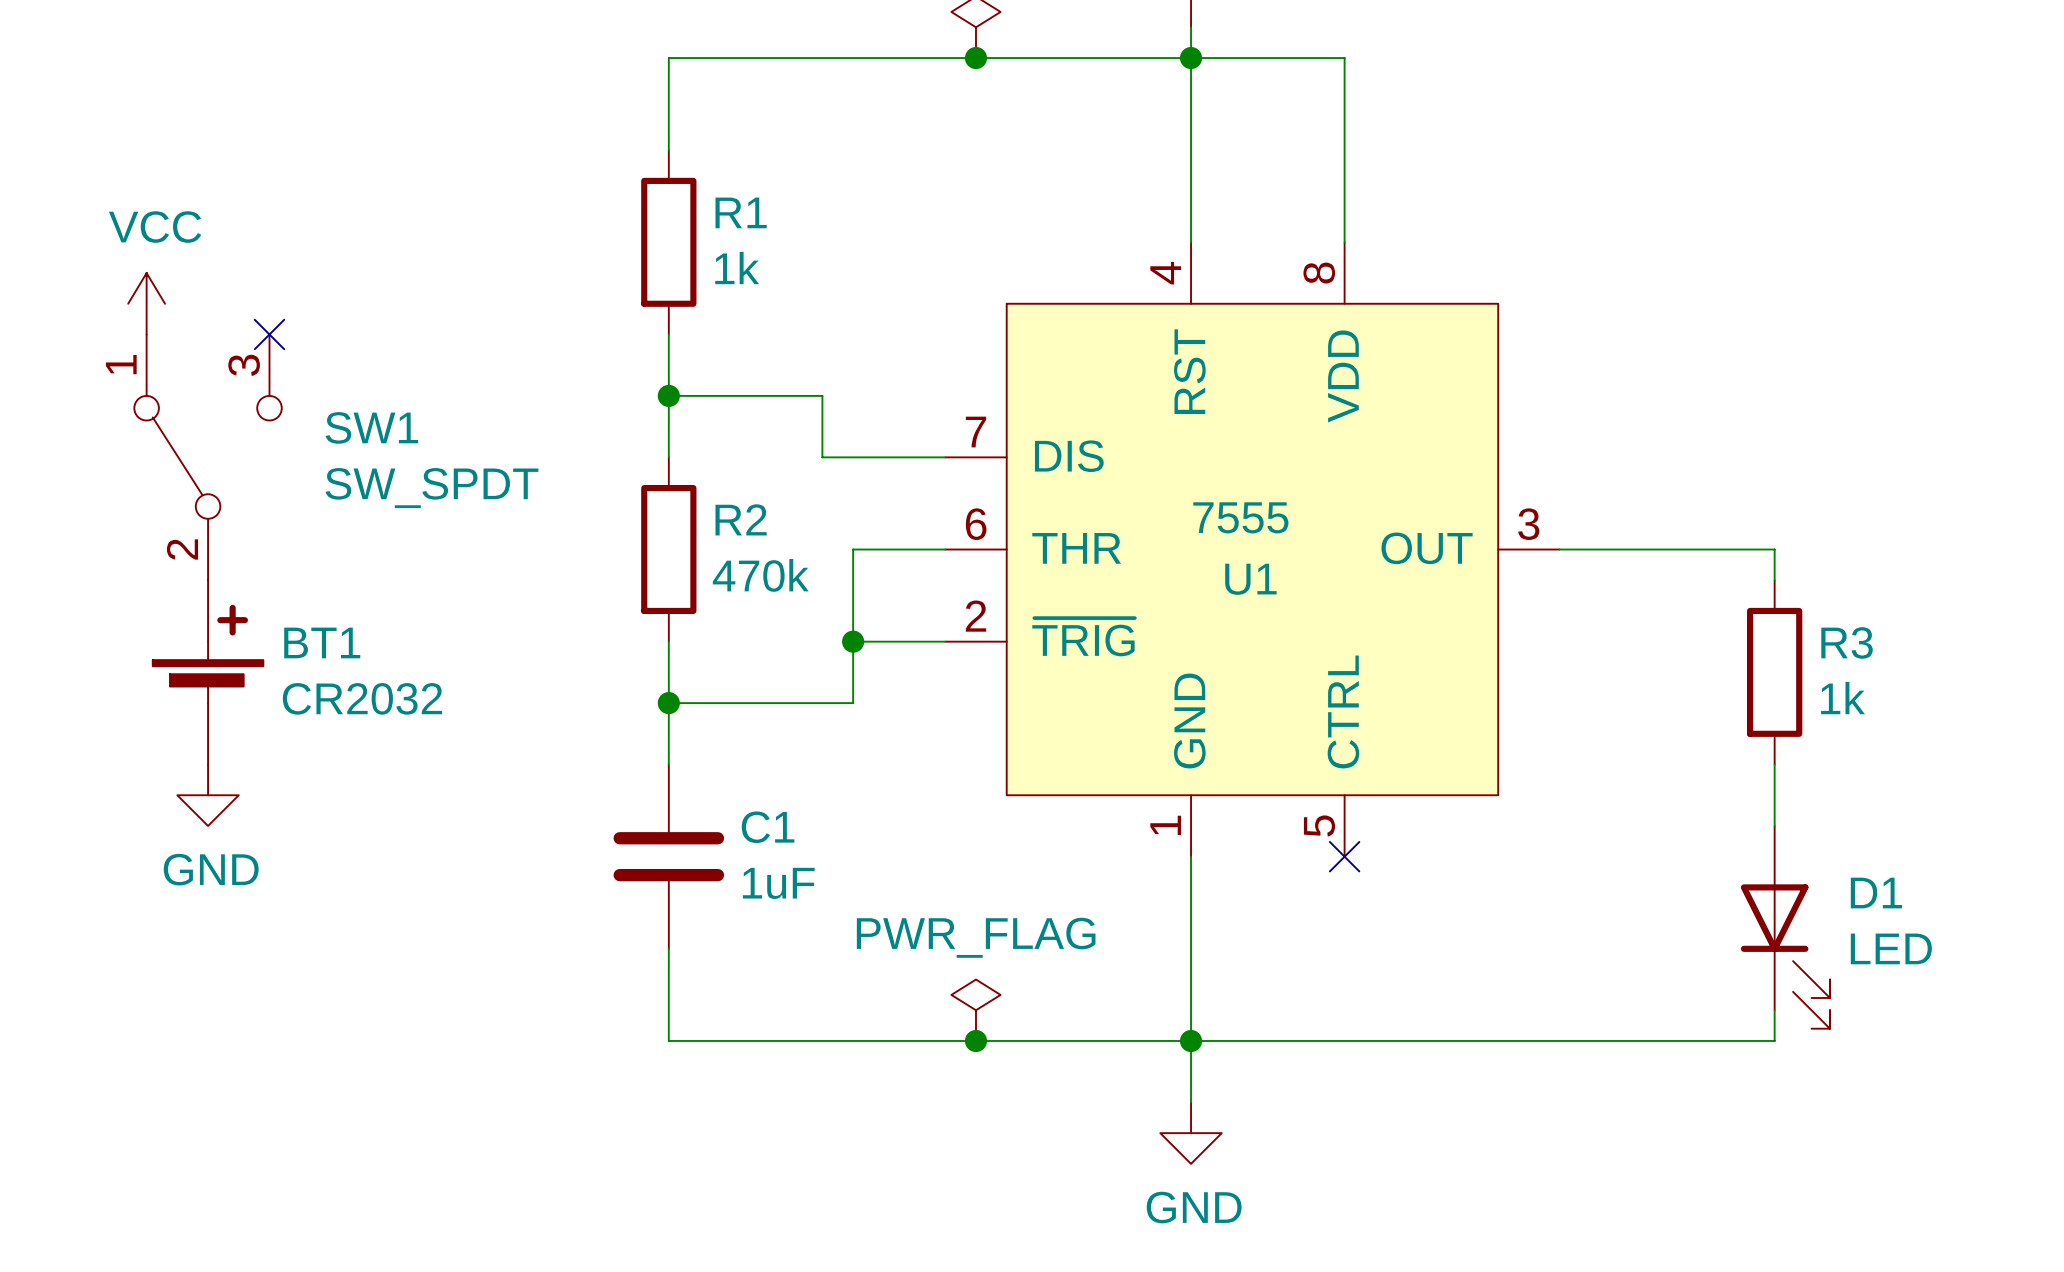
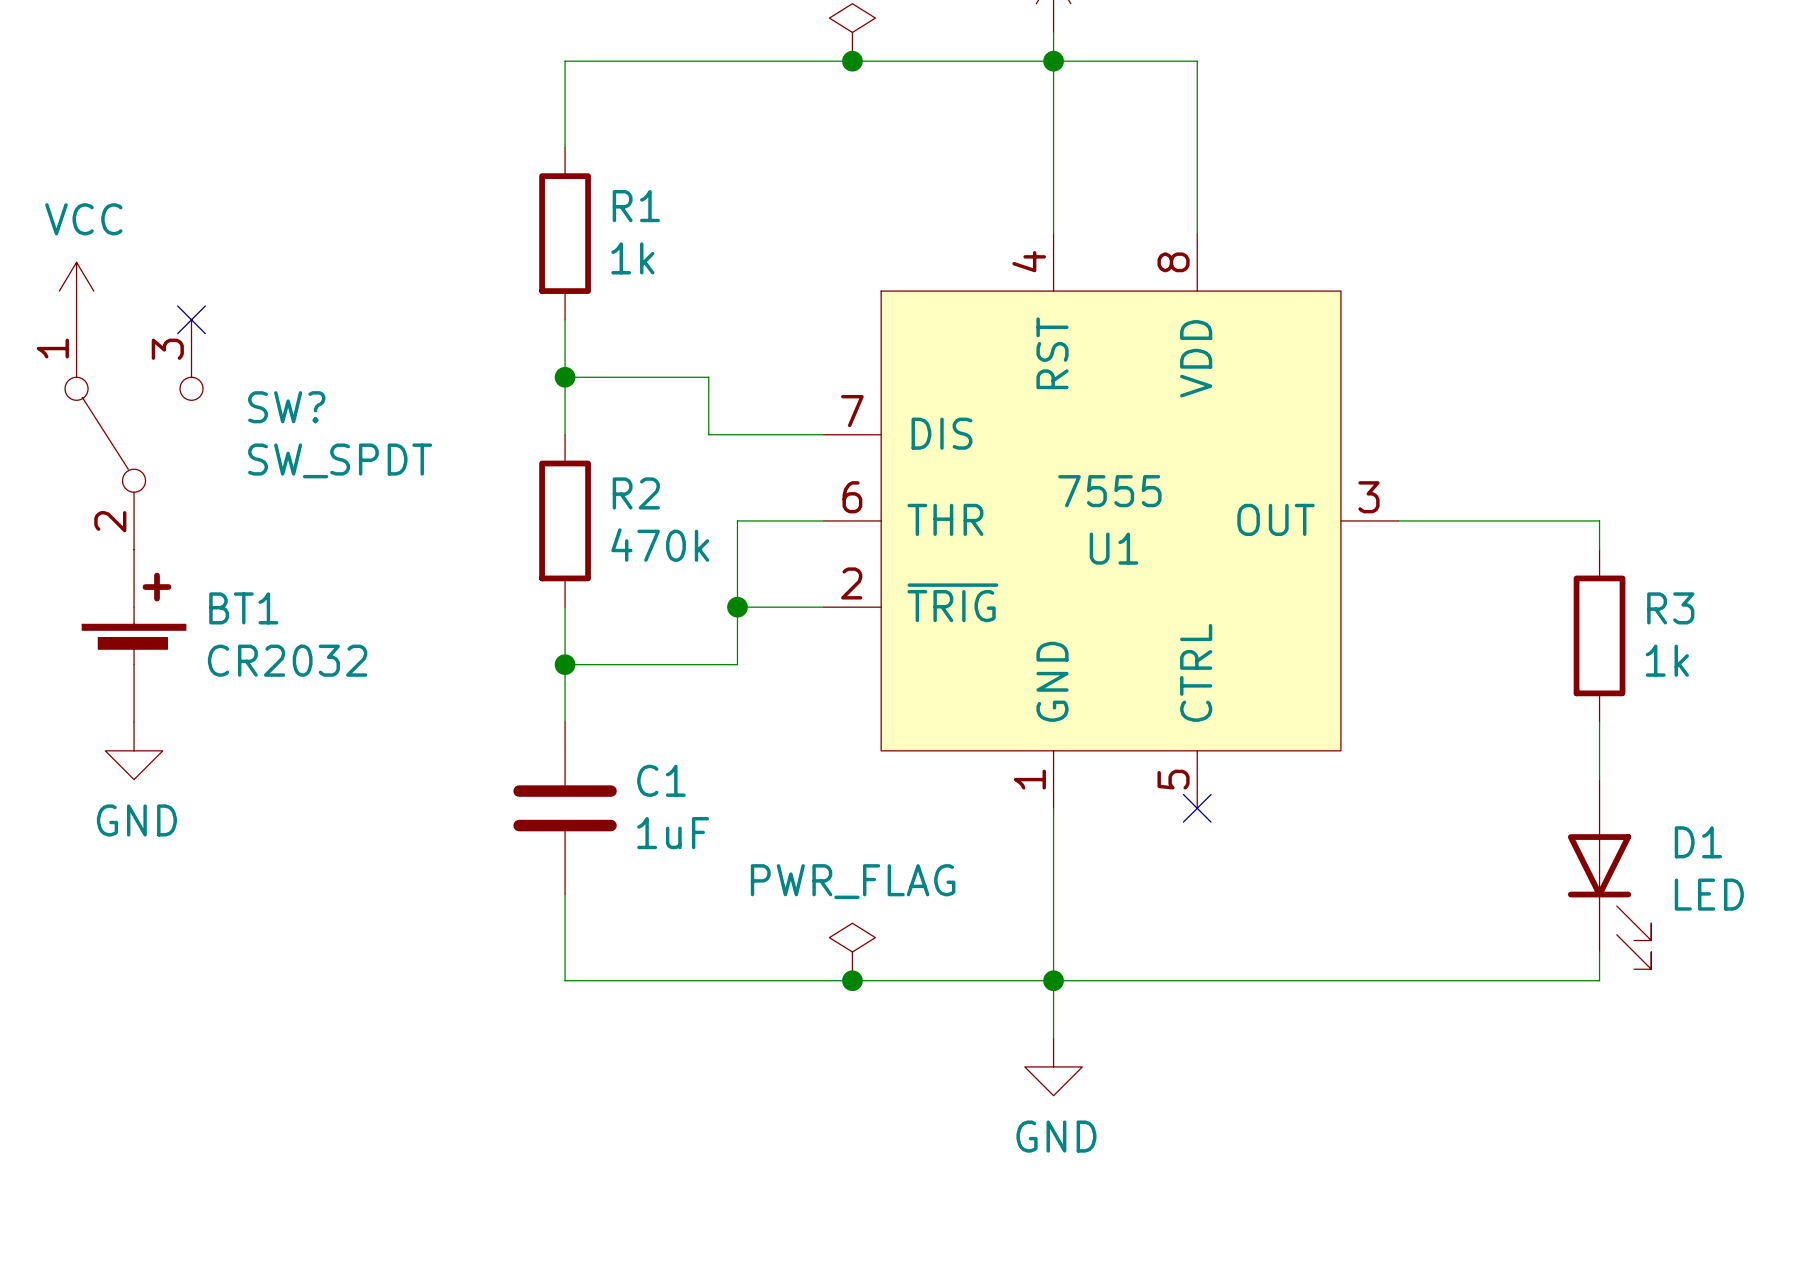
SW1 name: SW1 (371, 427) -> SW? (286, 407)

